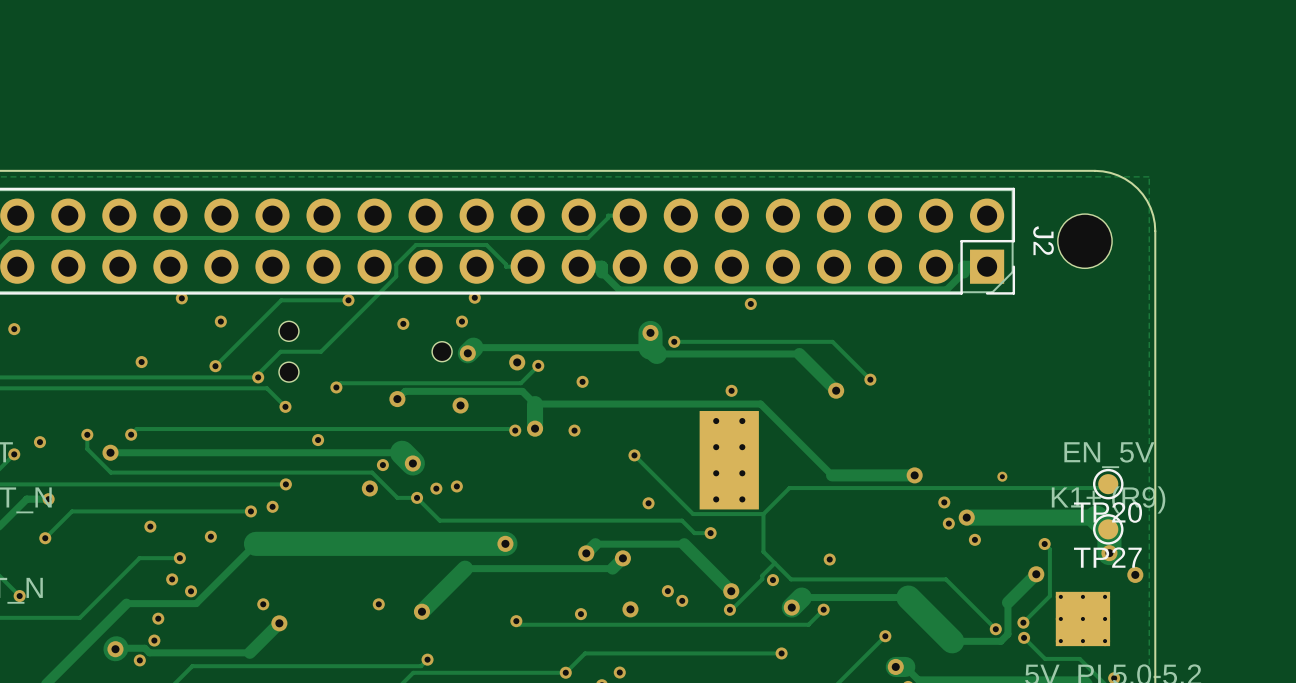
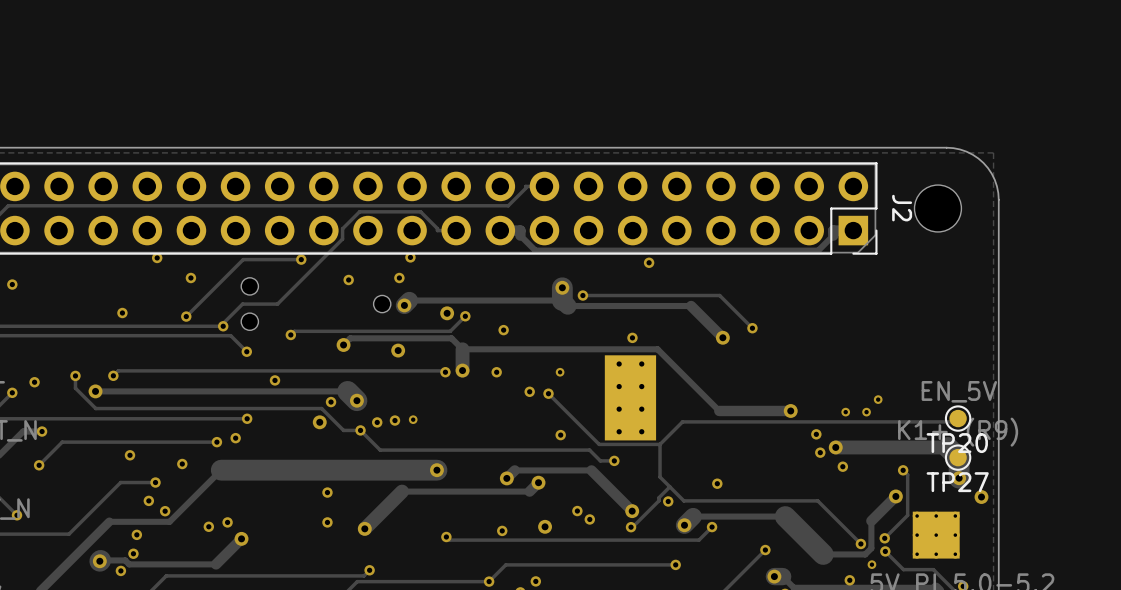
via: none -> (560, 372)
via: none -> (529, 391)
via: none -> (878, 399)
via: none -> (845, 412)
via: none -> (413, 419)
via: none -> (327, 492)
via: none -> (208, 526)
via: none -> (871, 564)
via: none -> (849, 580)

